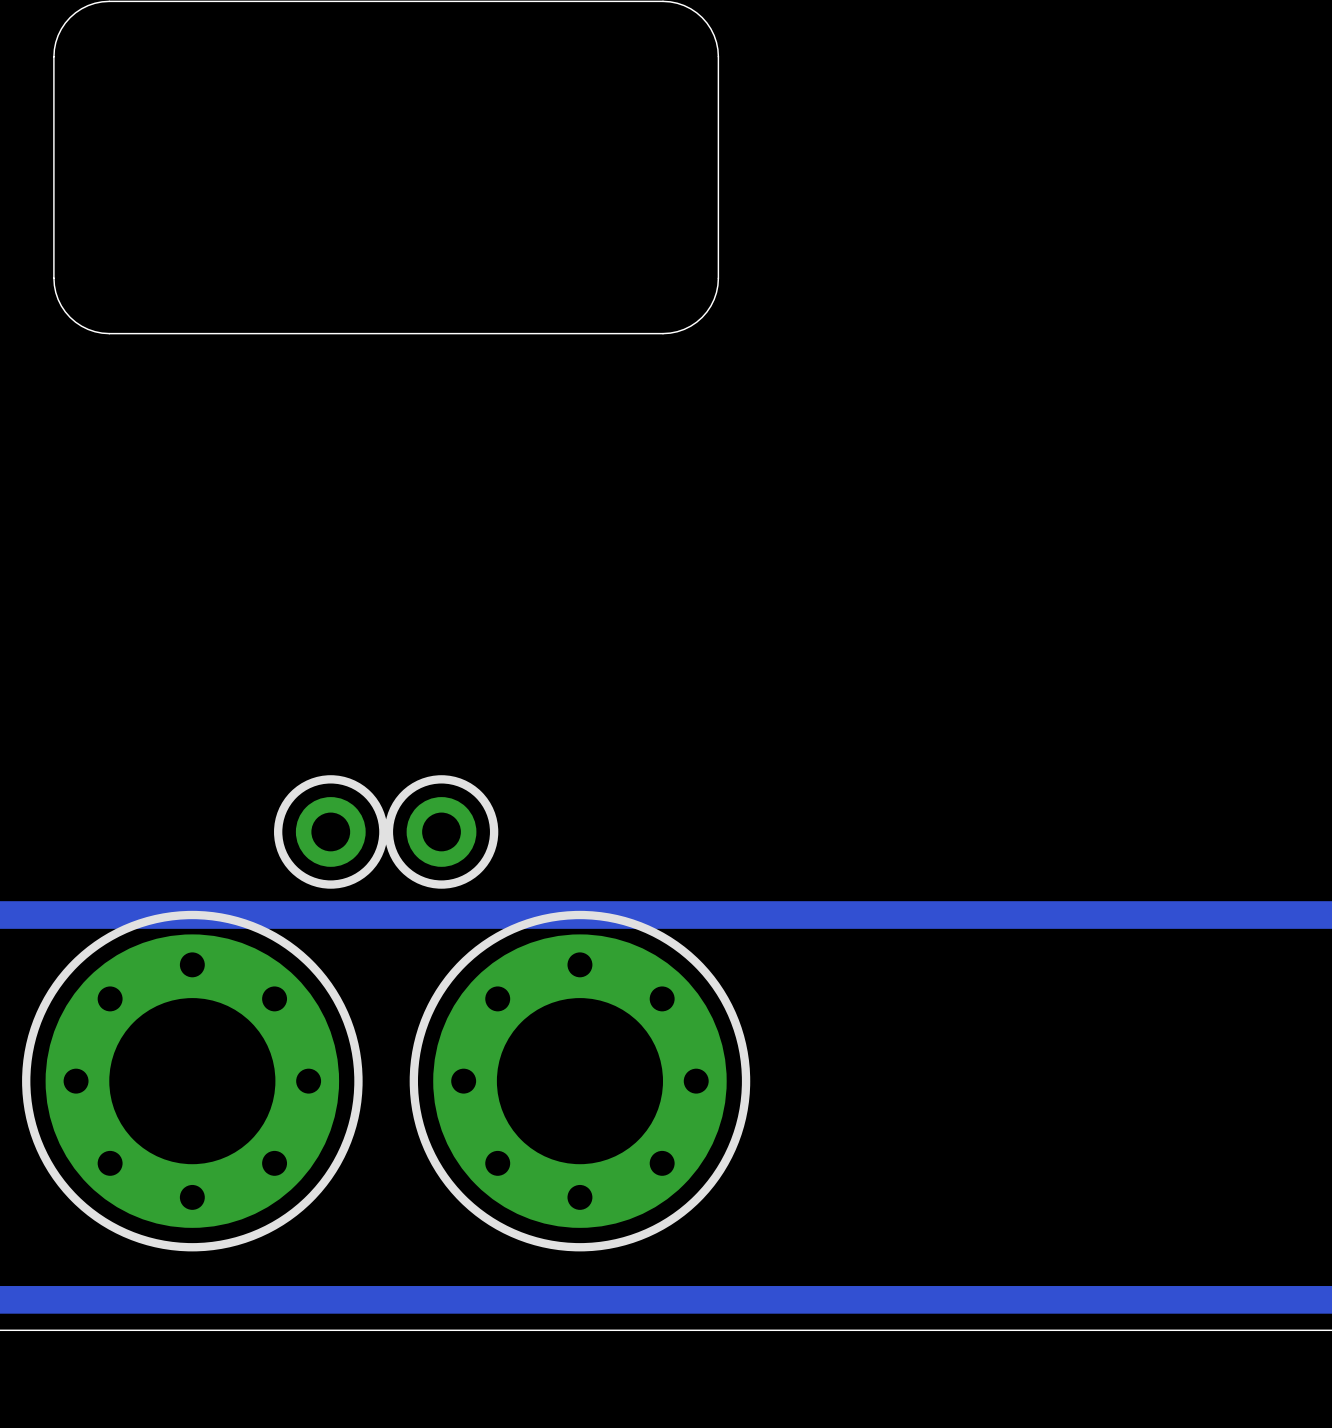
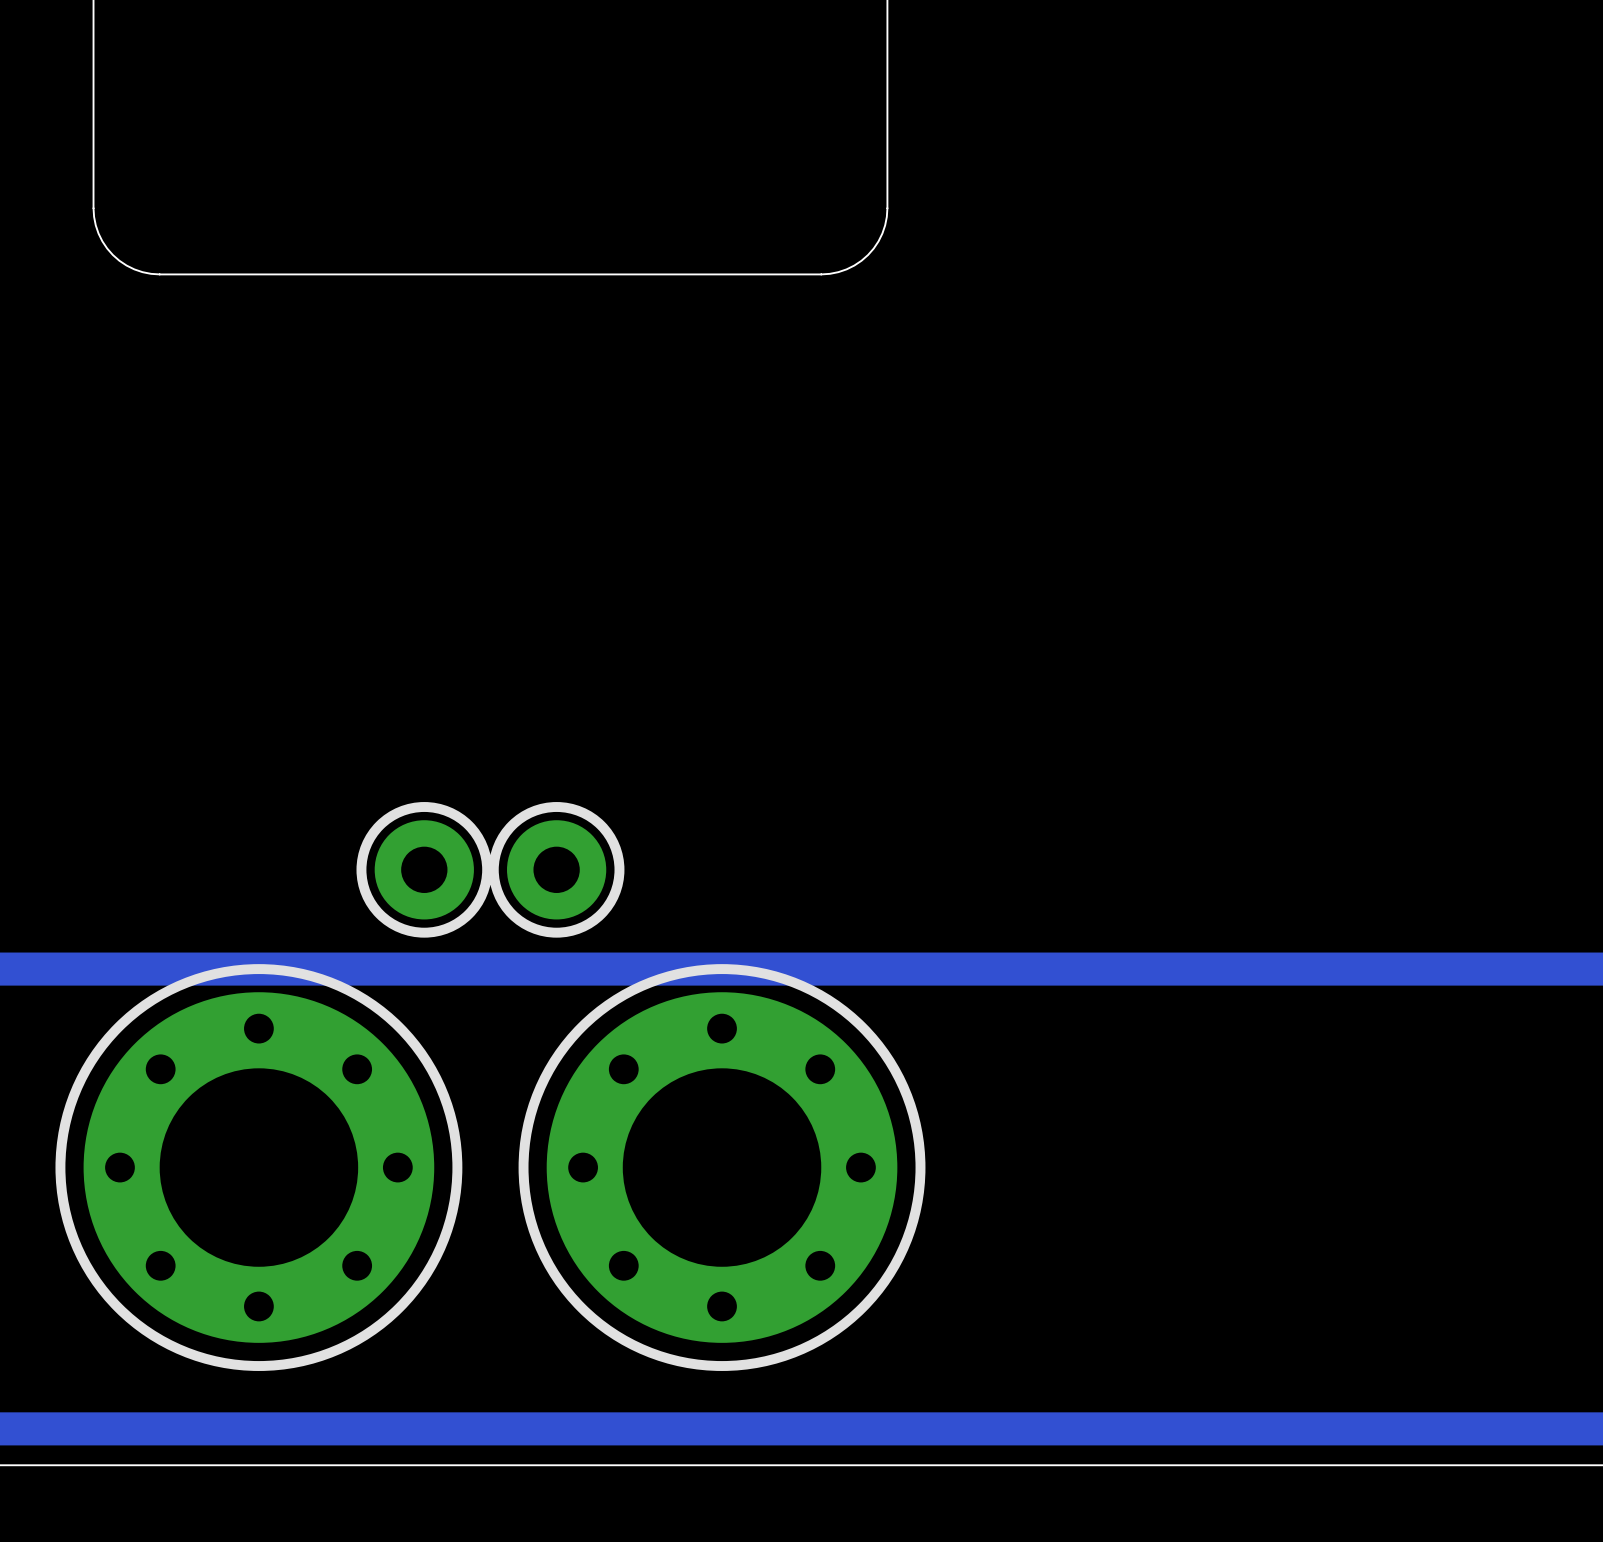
part footprint: [274, 775, 388, 889] -> [356, 802, 493, 938]
part footprint: [384, 775, 499, 889] -> [488, 802, 625, 938]

